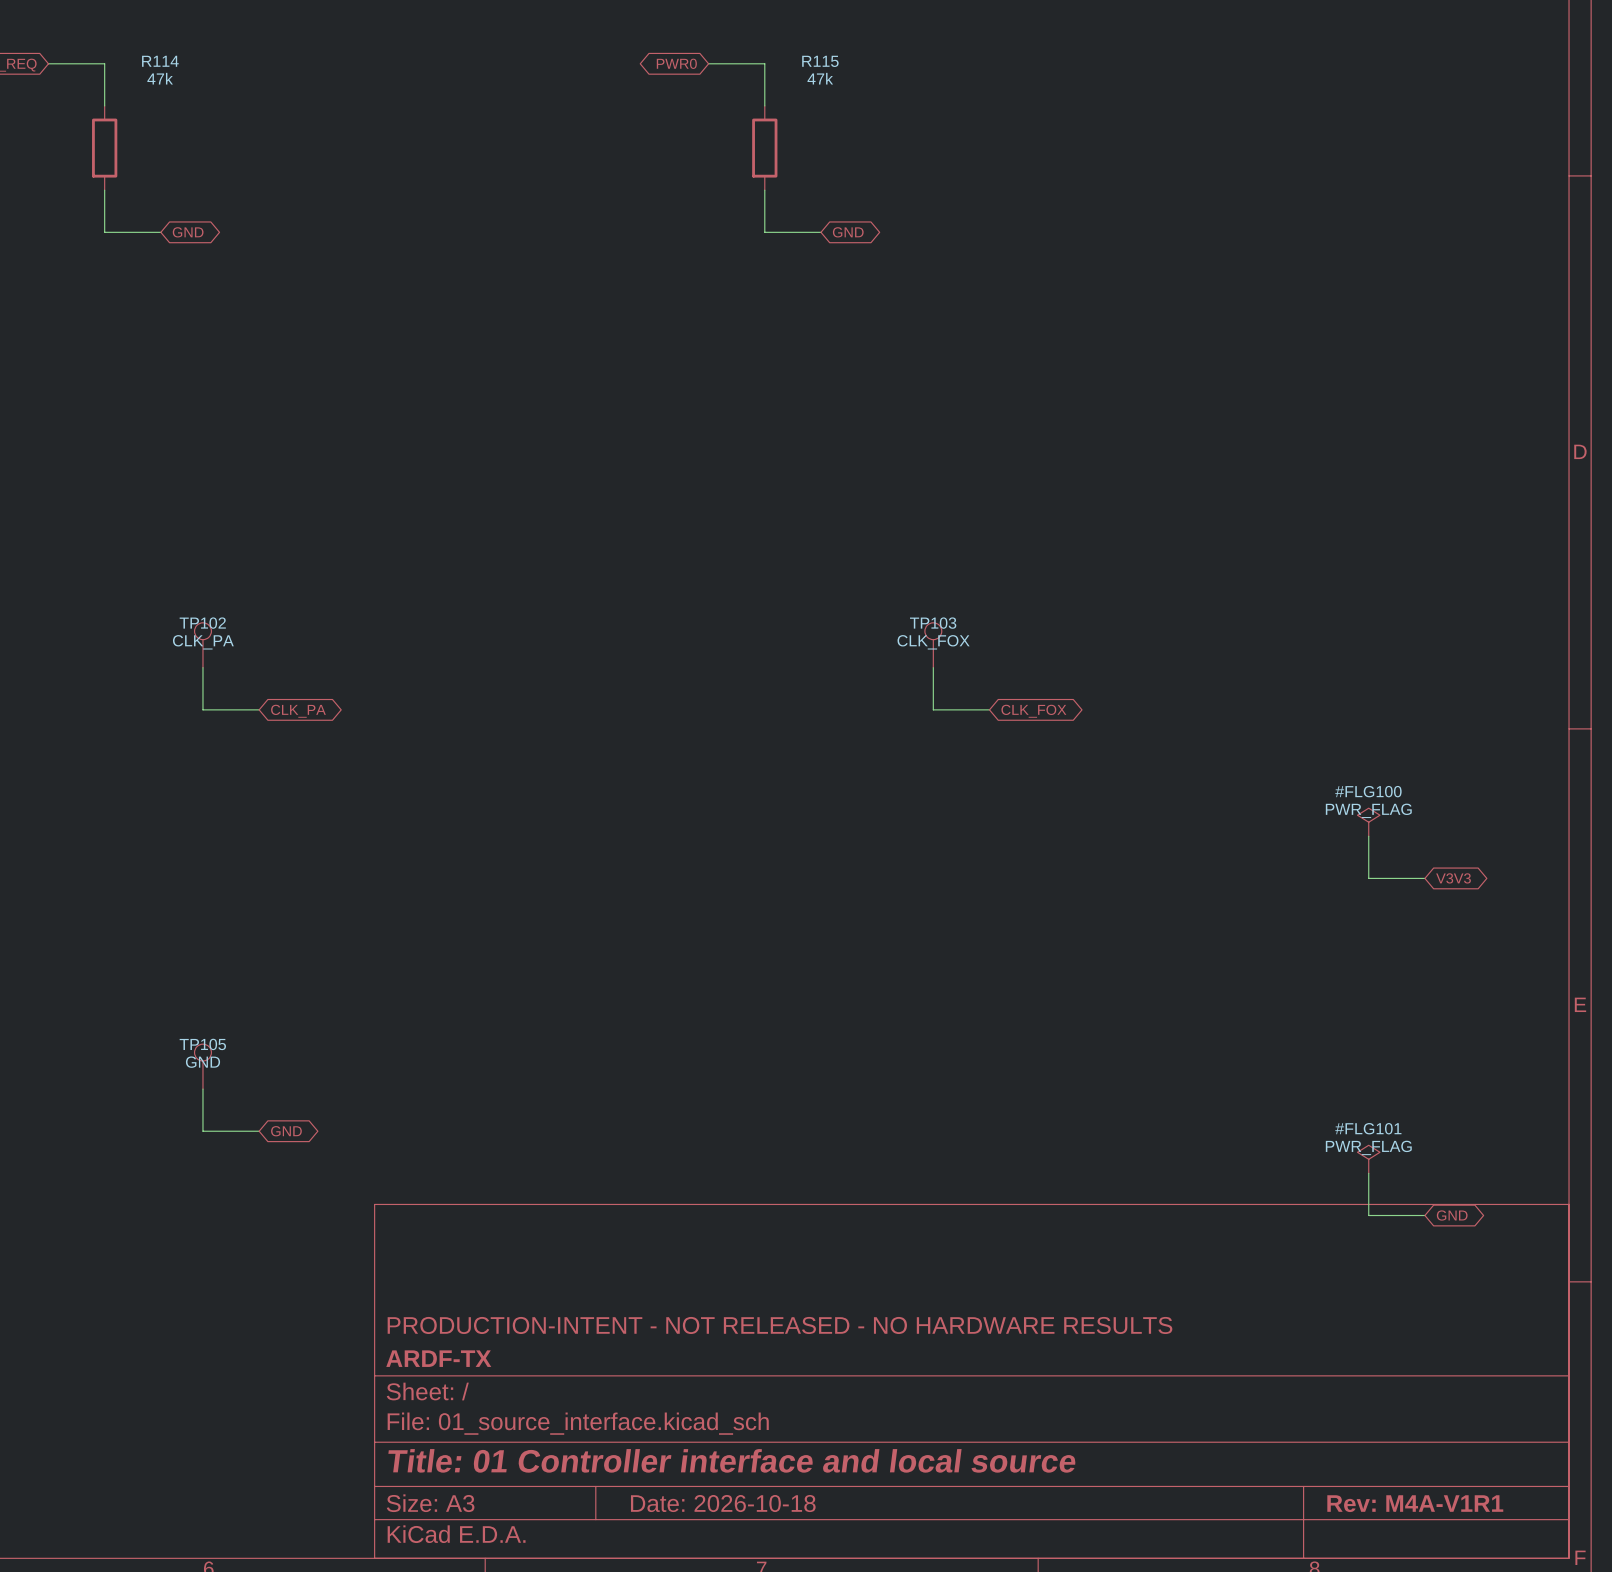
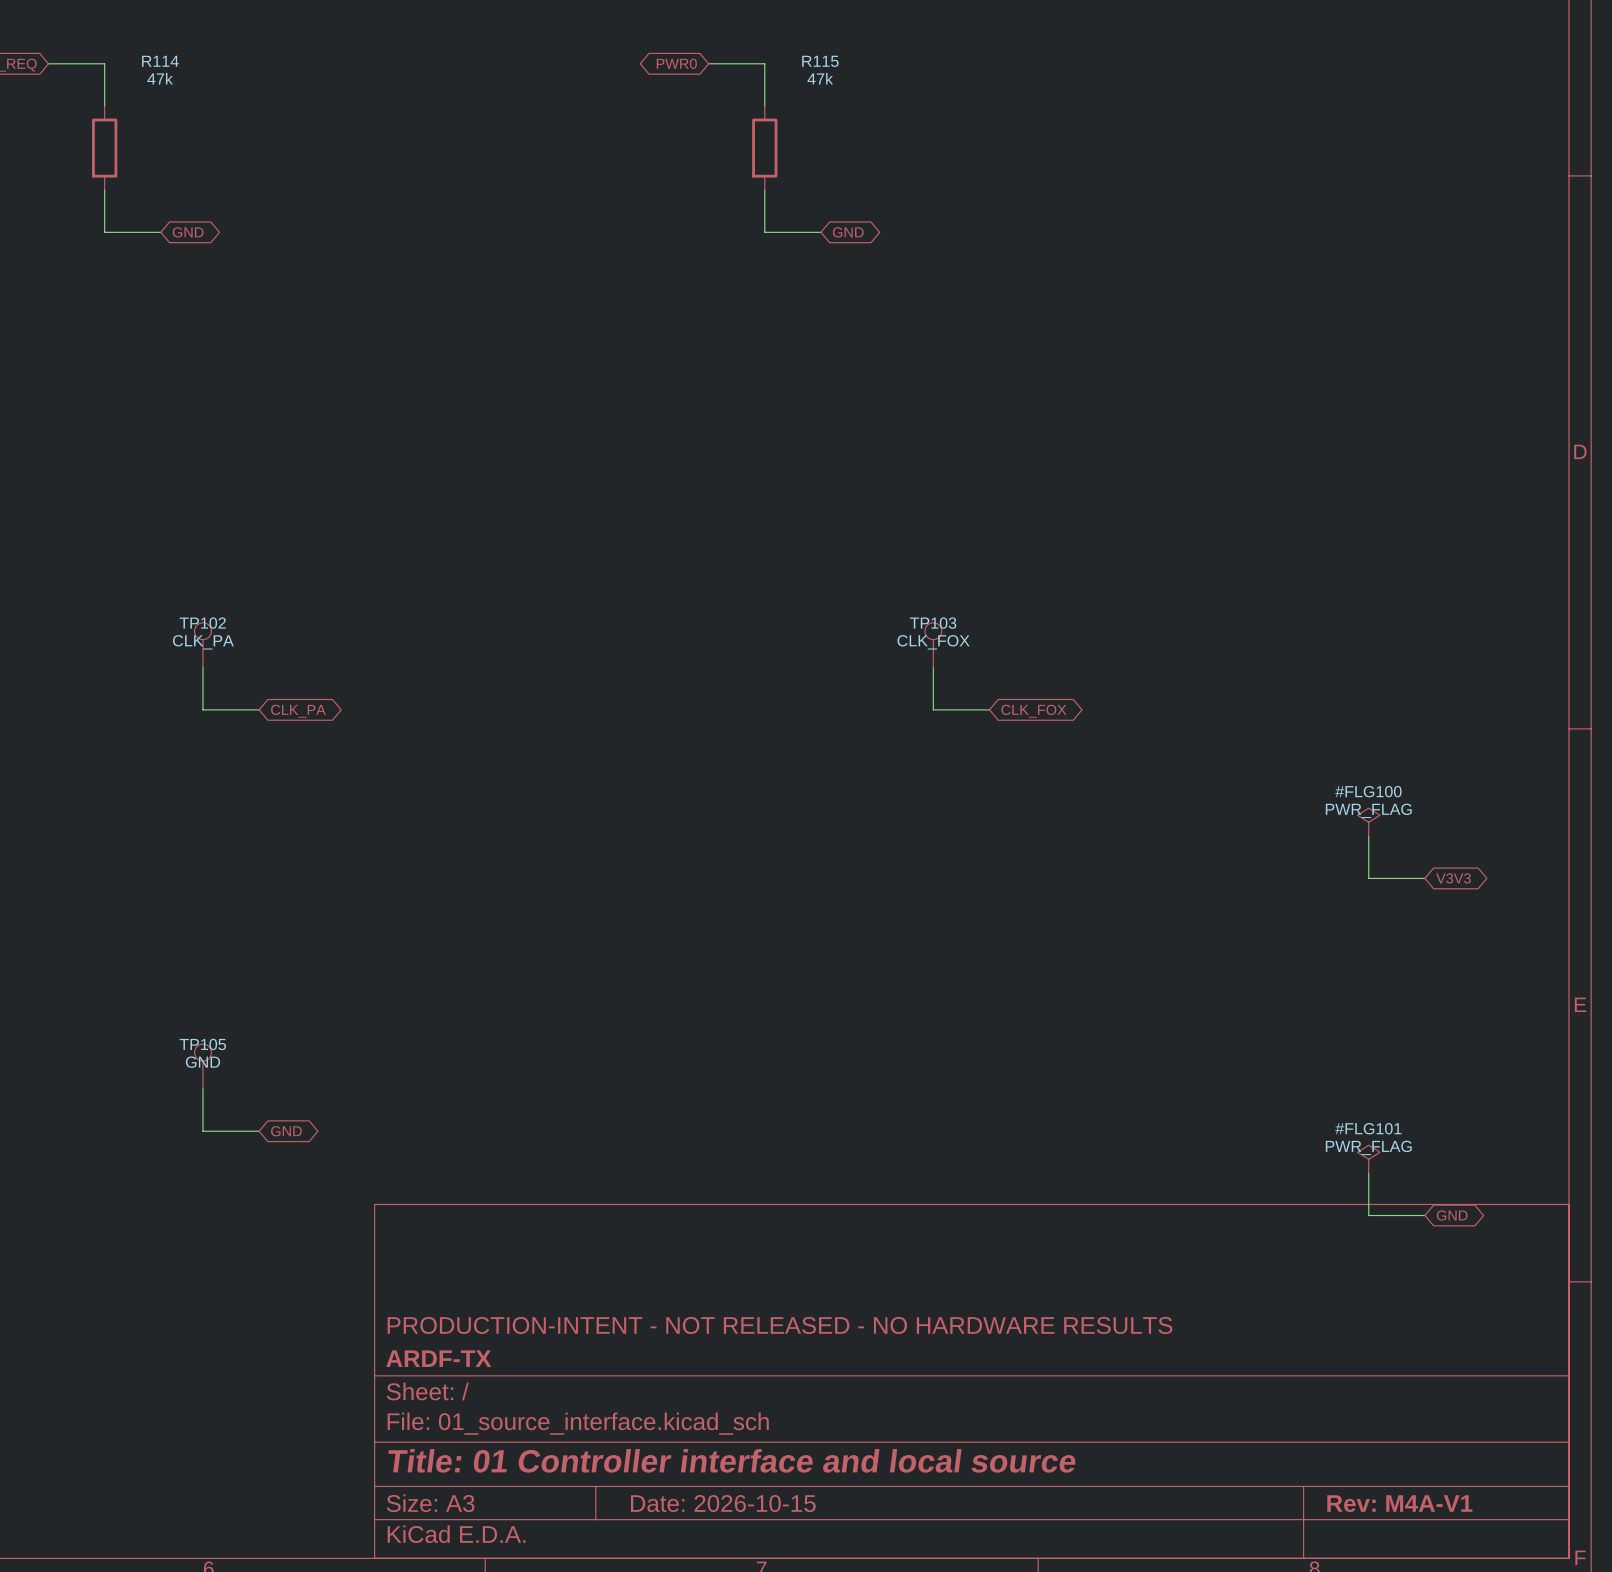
title block: Date: 2026-10-18 (723, 1503) -> Date: 2026-10-15 (723, 1503)
title block: Rev: M4A-V1R1 (1415, 1503) -> Rev: M4A-V1 (1399, 1503)

